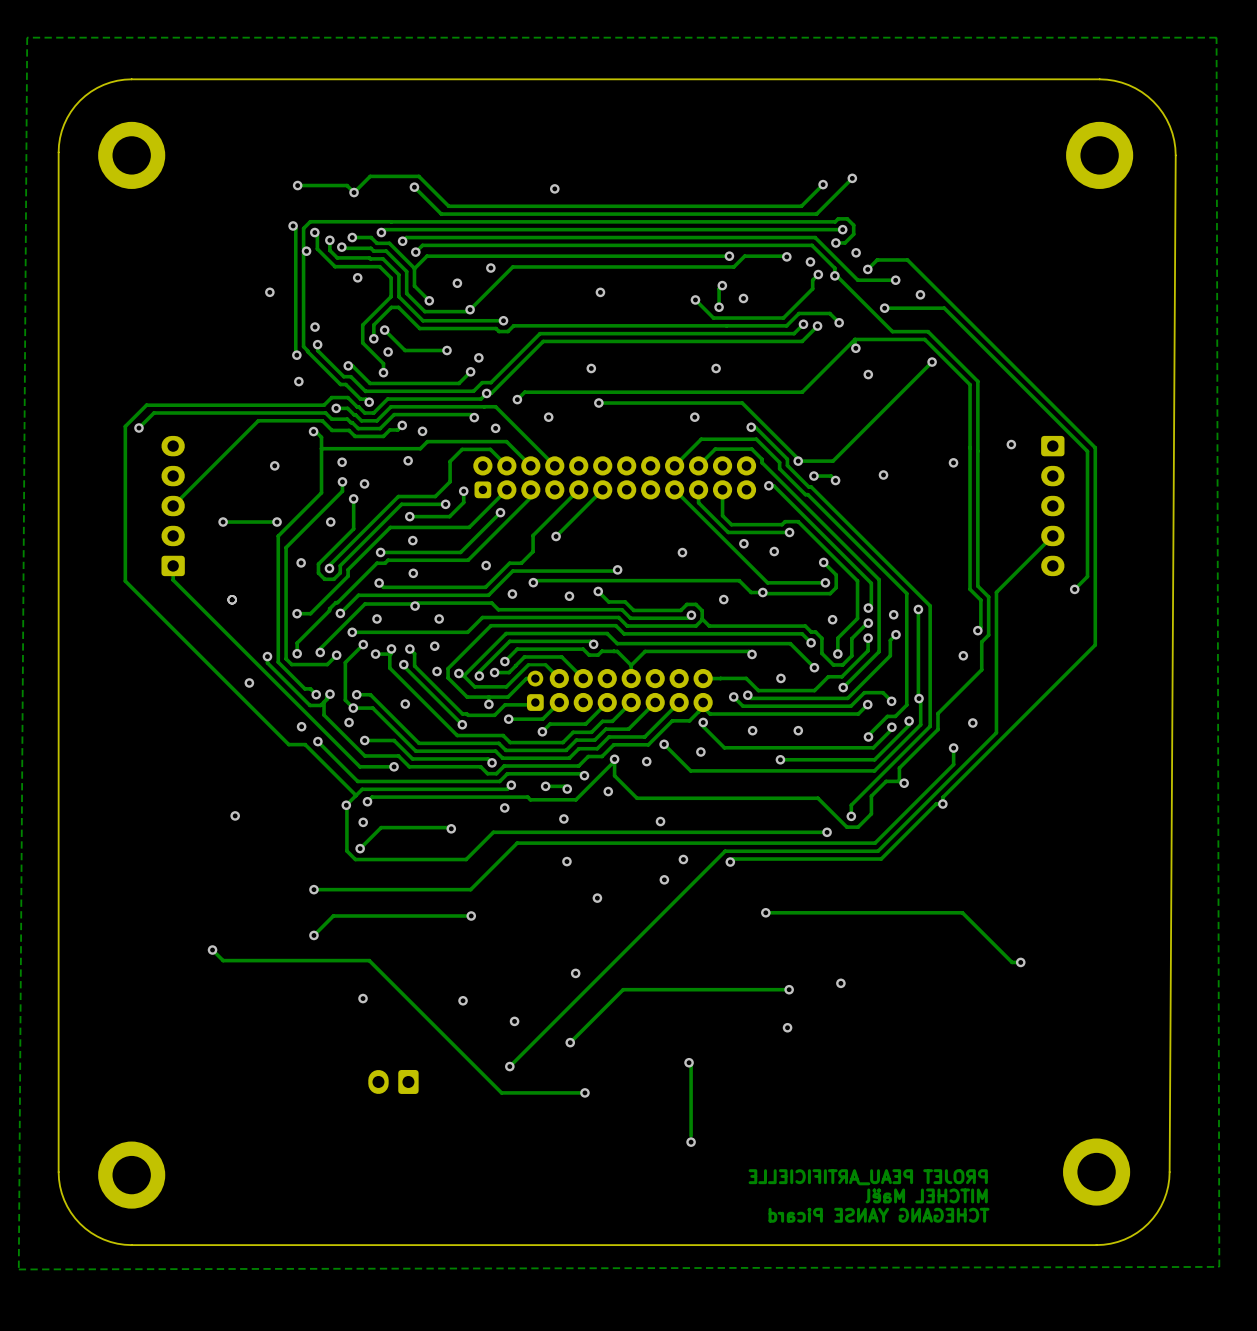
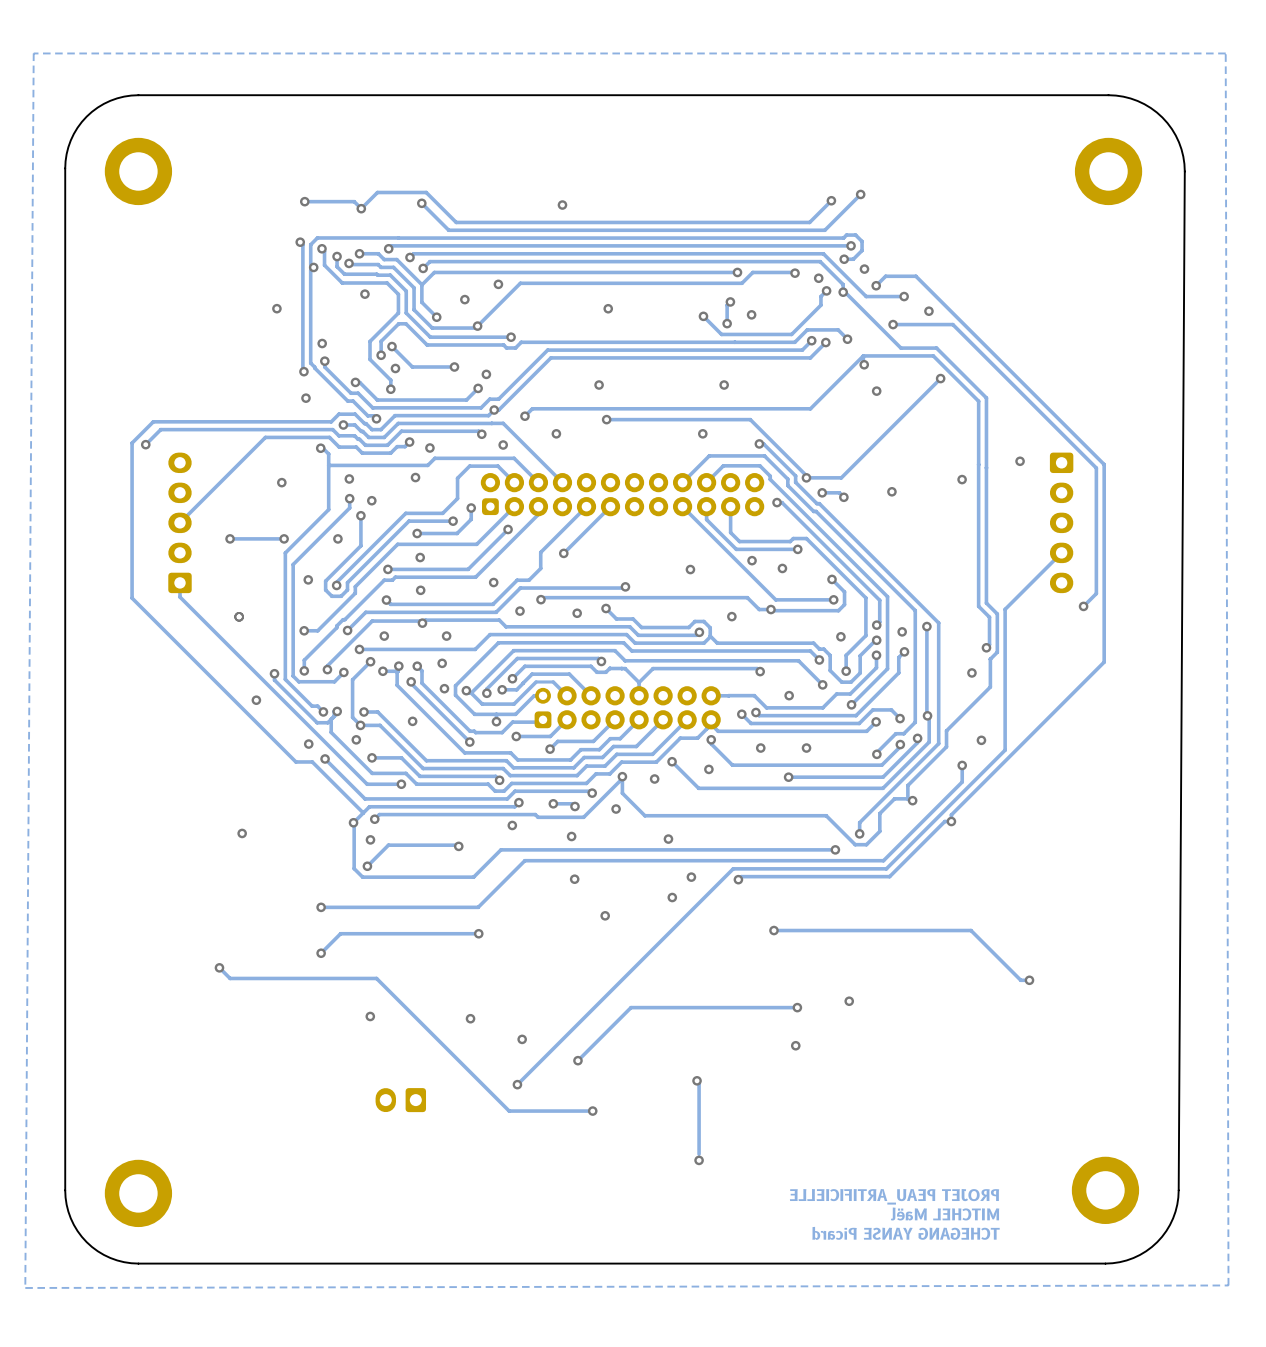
via: (575, 973) -> none

